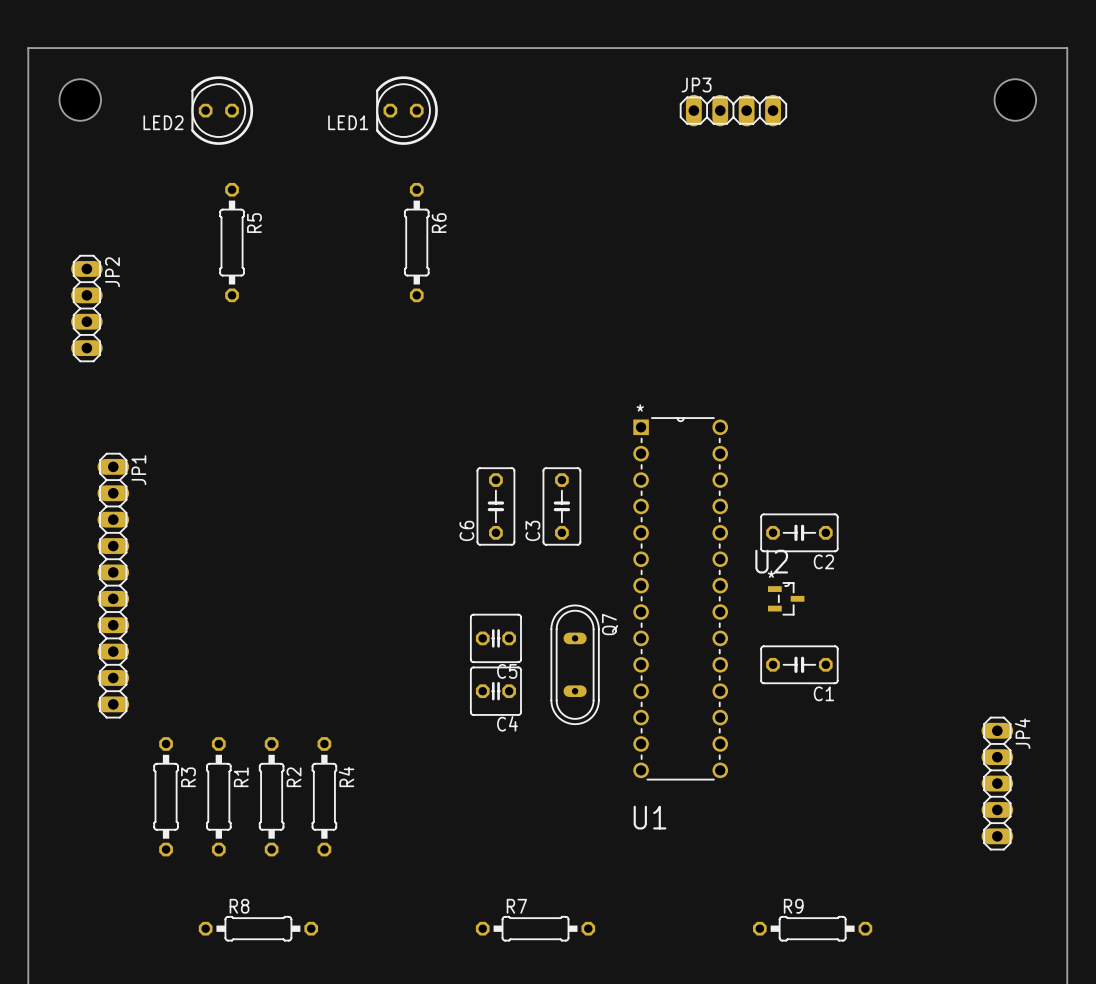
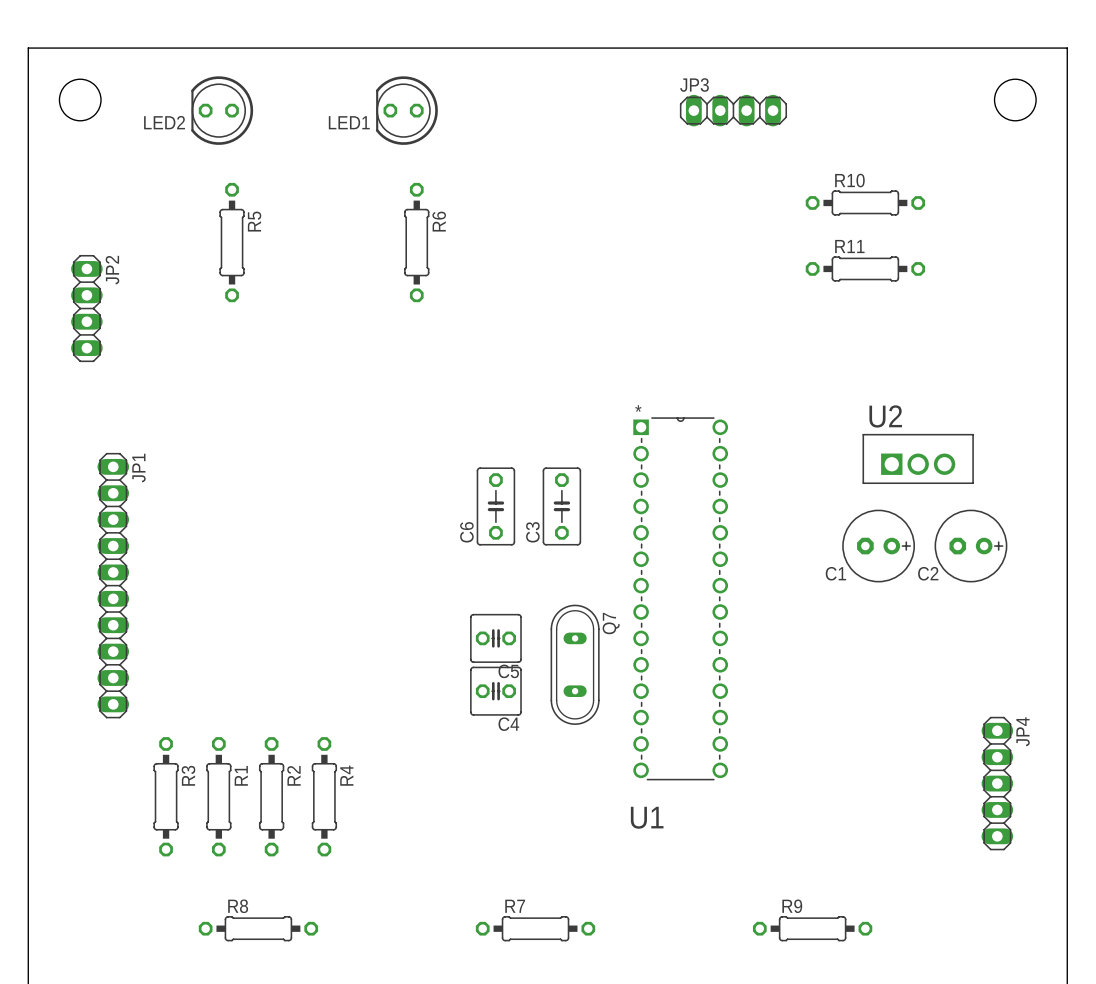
R10: none -> (865, 202)
R11: none -> (865, 268)
C2 footprint: [760, 513, 839, 553] -> [934, 509, 1008, 583]
C2 name position: C2 (823, 561) -> C2 (928, 573)
U2 footprint: [768, 582, 805, 616] -> [862, 433, 974, 485]
C1 footprint: [760, 645, 839, 685] -> [842, 509, 916, 583]
C1 name position: C1 (823, 693) -> C1 (835, 573)

